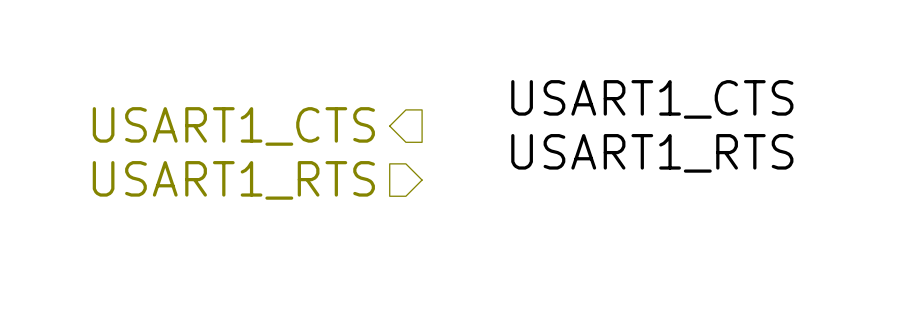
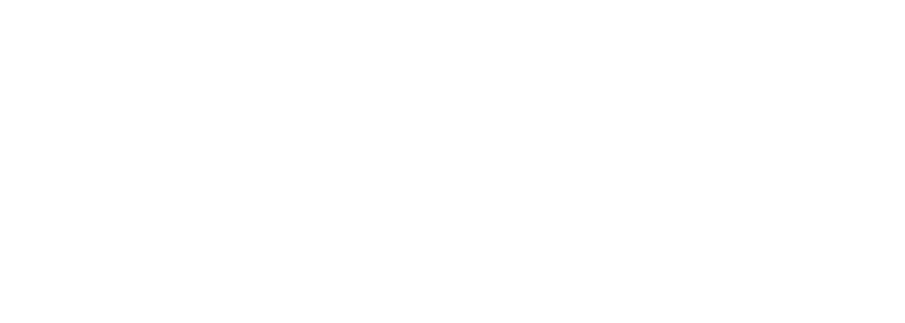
label: USART1_CTS (652, 99) -> none
hierarchical label: USART1_CTS (233, 126) -> none
label: USART1_RTS (652, 153) -> none
hierarchical label: USART1_RTS (233, 180) -> none

